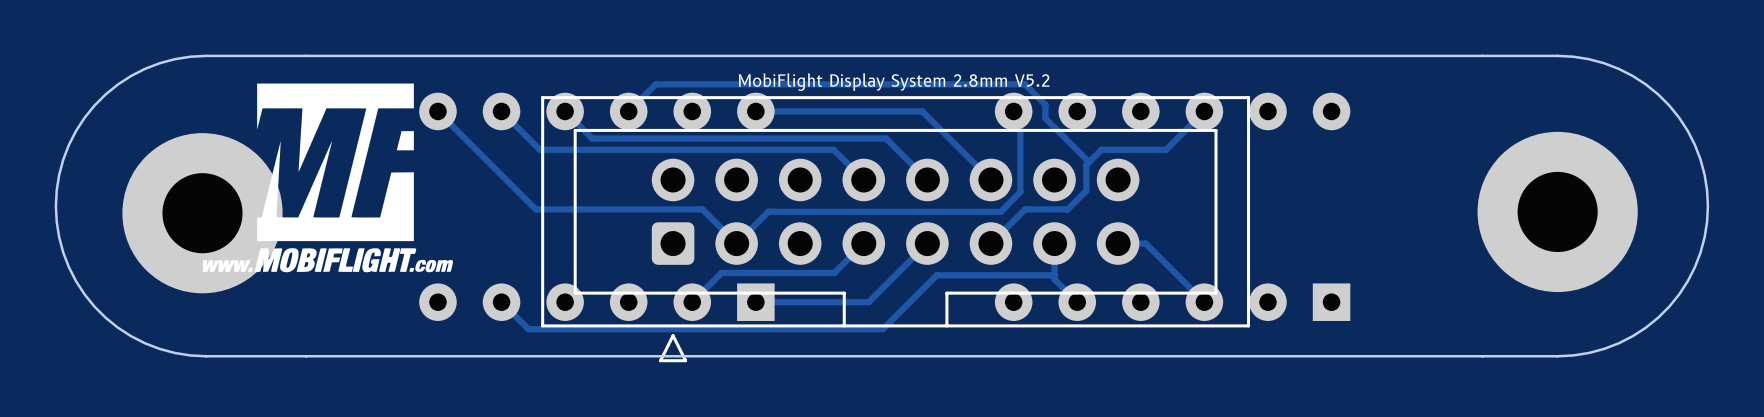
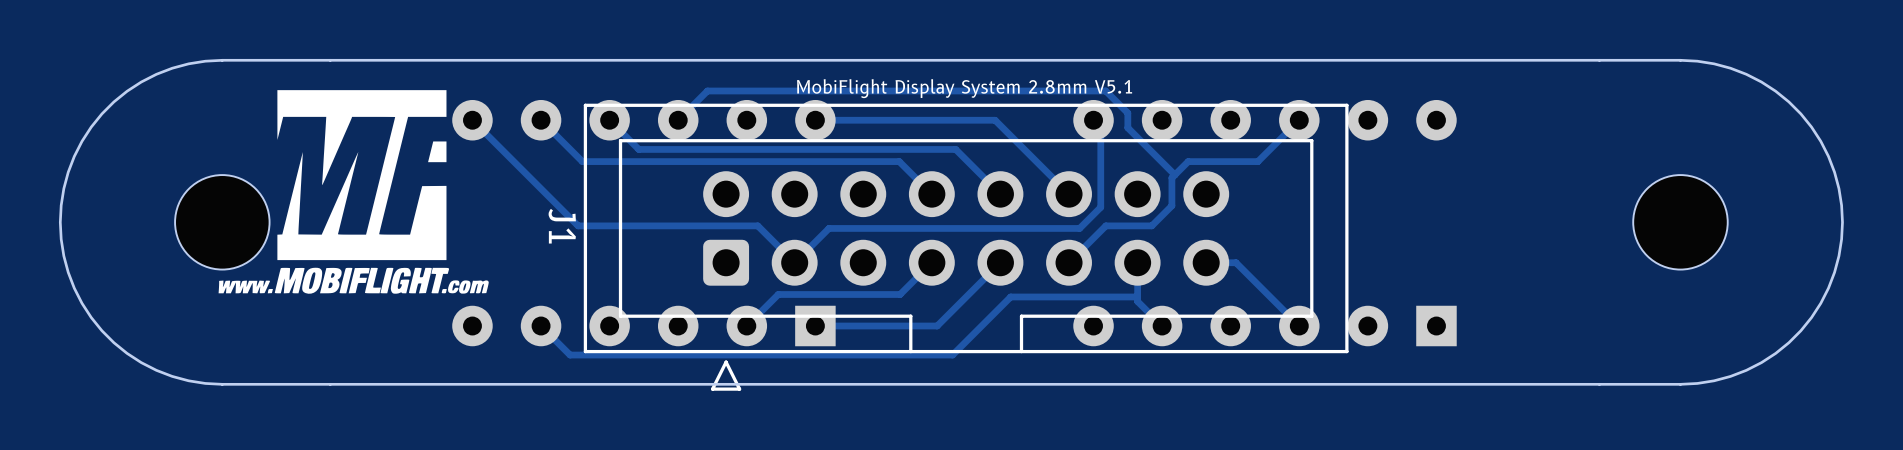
text: MobiFlight Display System 2.8mm V5.2 (894, 82) -> MobiFlight Display System 2.8mm V5.1 (964, 88)
part footprint: [1477, 131, 1638, 293] -> [1633, 175, 1728, 270]
part footprint: [122, 133, 283, 294] -> [175, 175, 270, 270]
J1 name: none -> J1 (562, 226)

